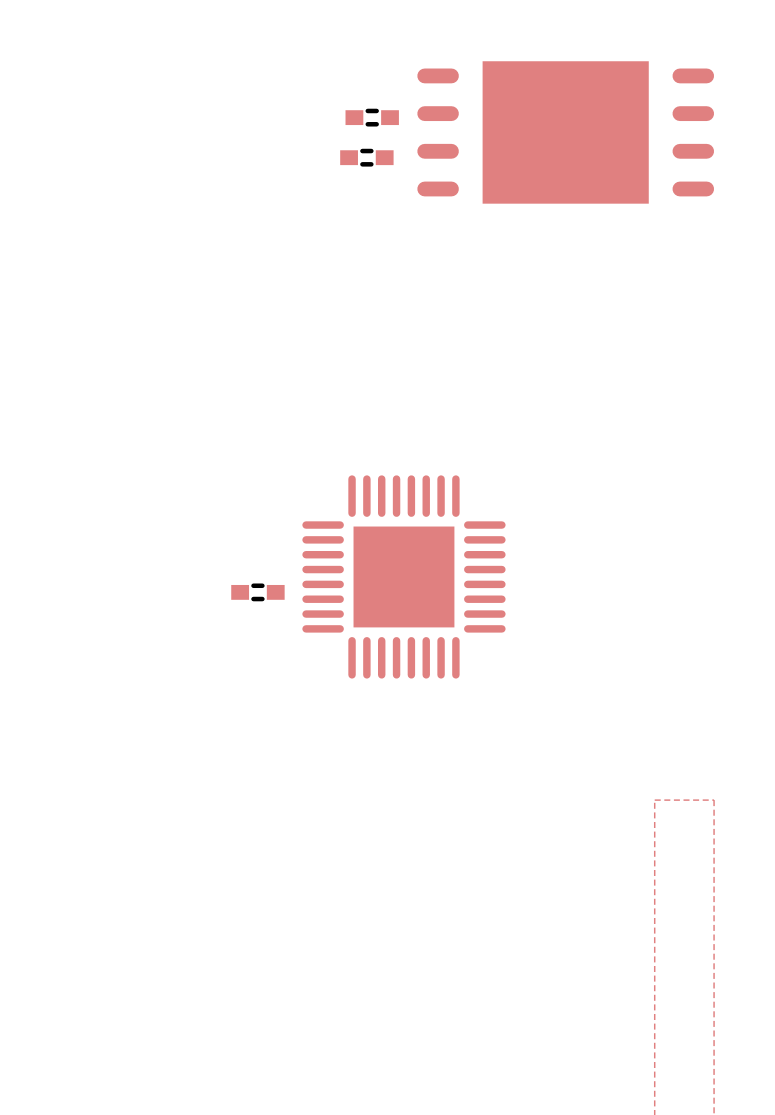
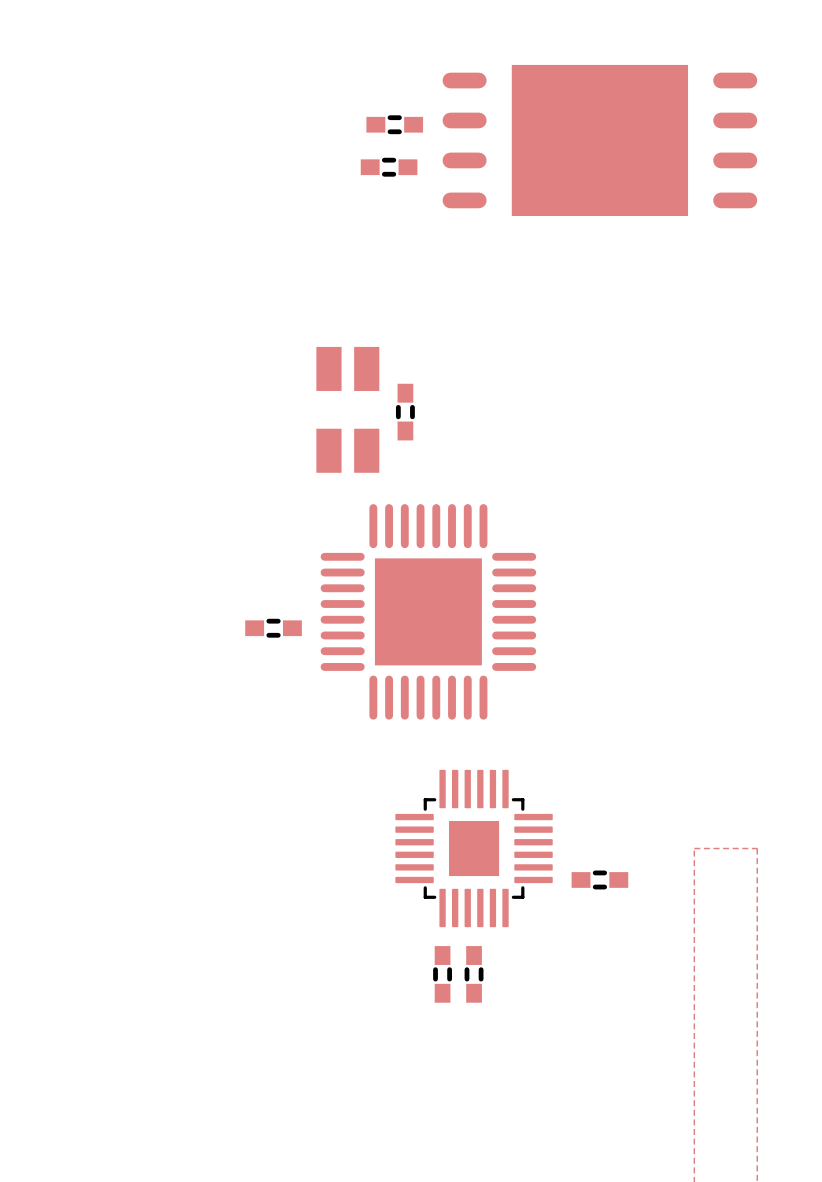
part: none -> (347, 409)
part: none -> (405, 412)
part: none -> (474, 848)
part: none -> (599, 879)
part: none -> (442, 974)
part: none -> (474, 974)

